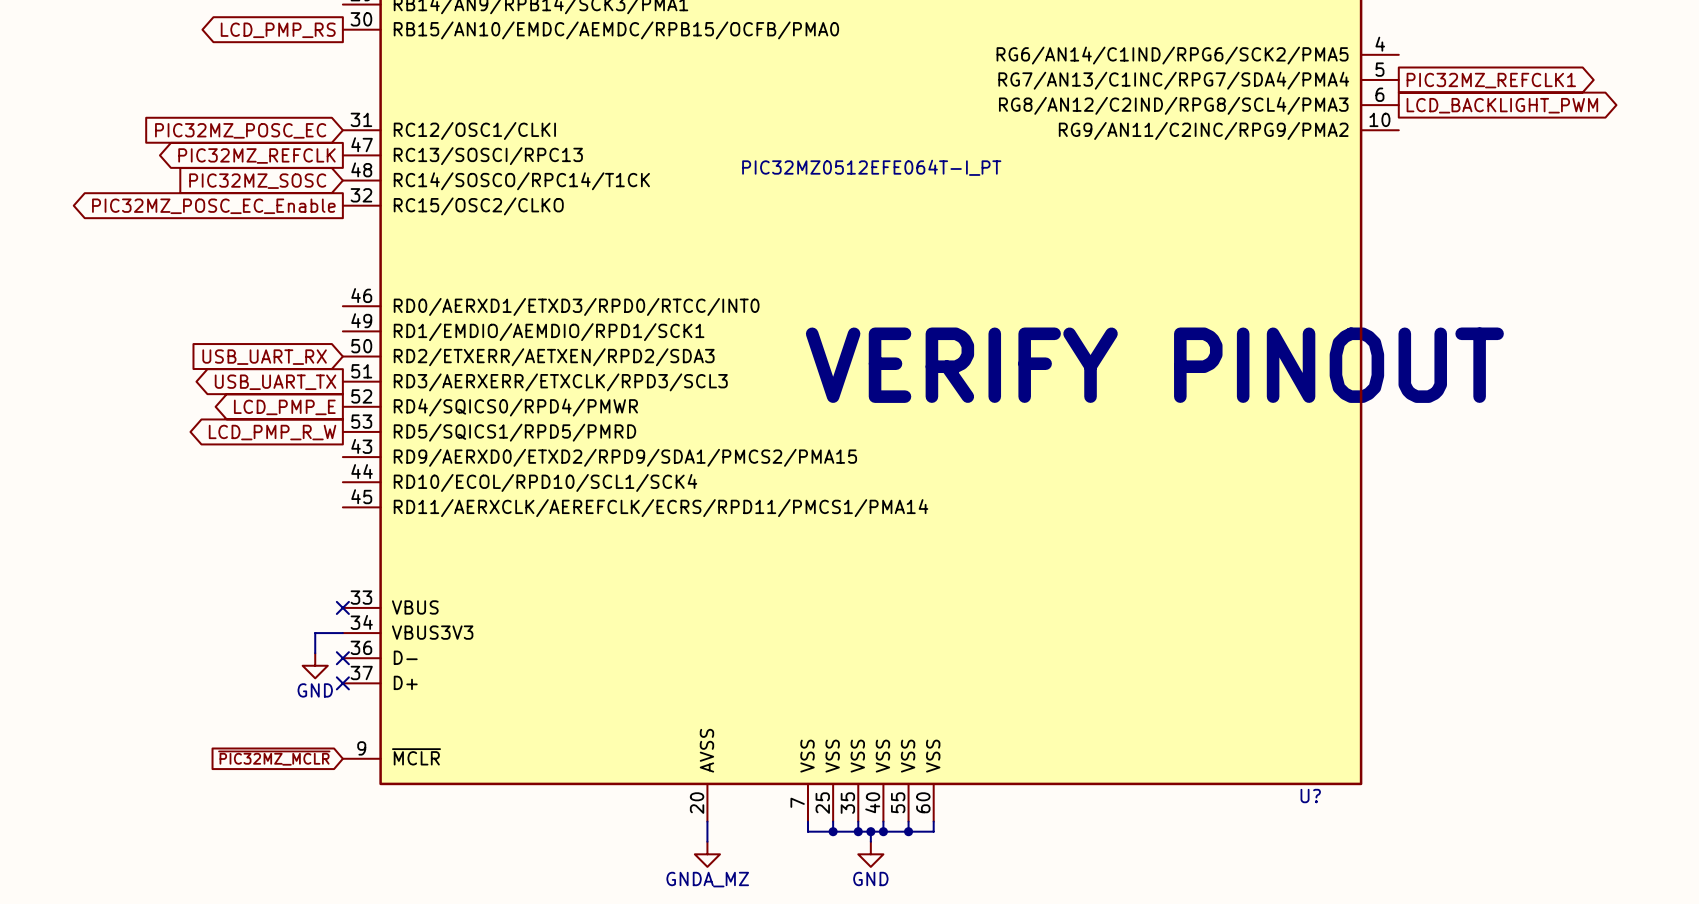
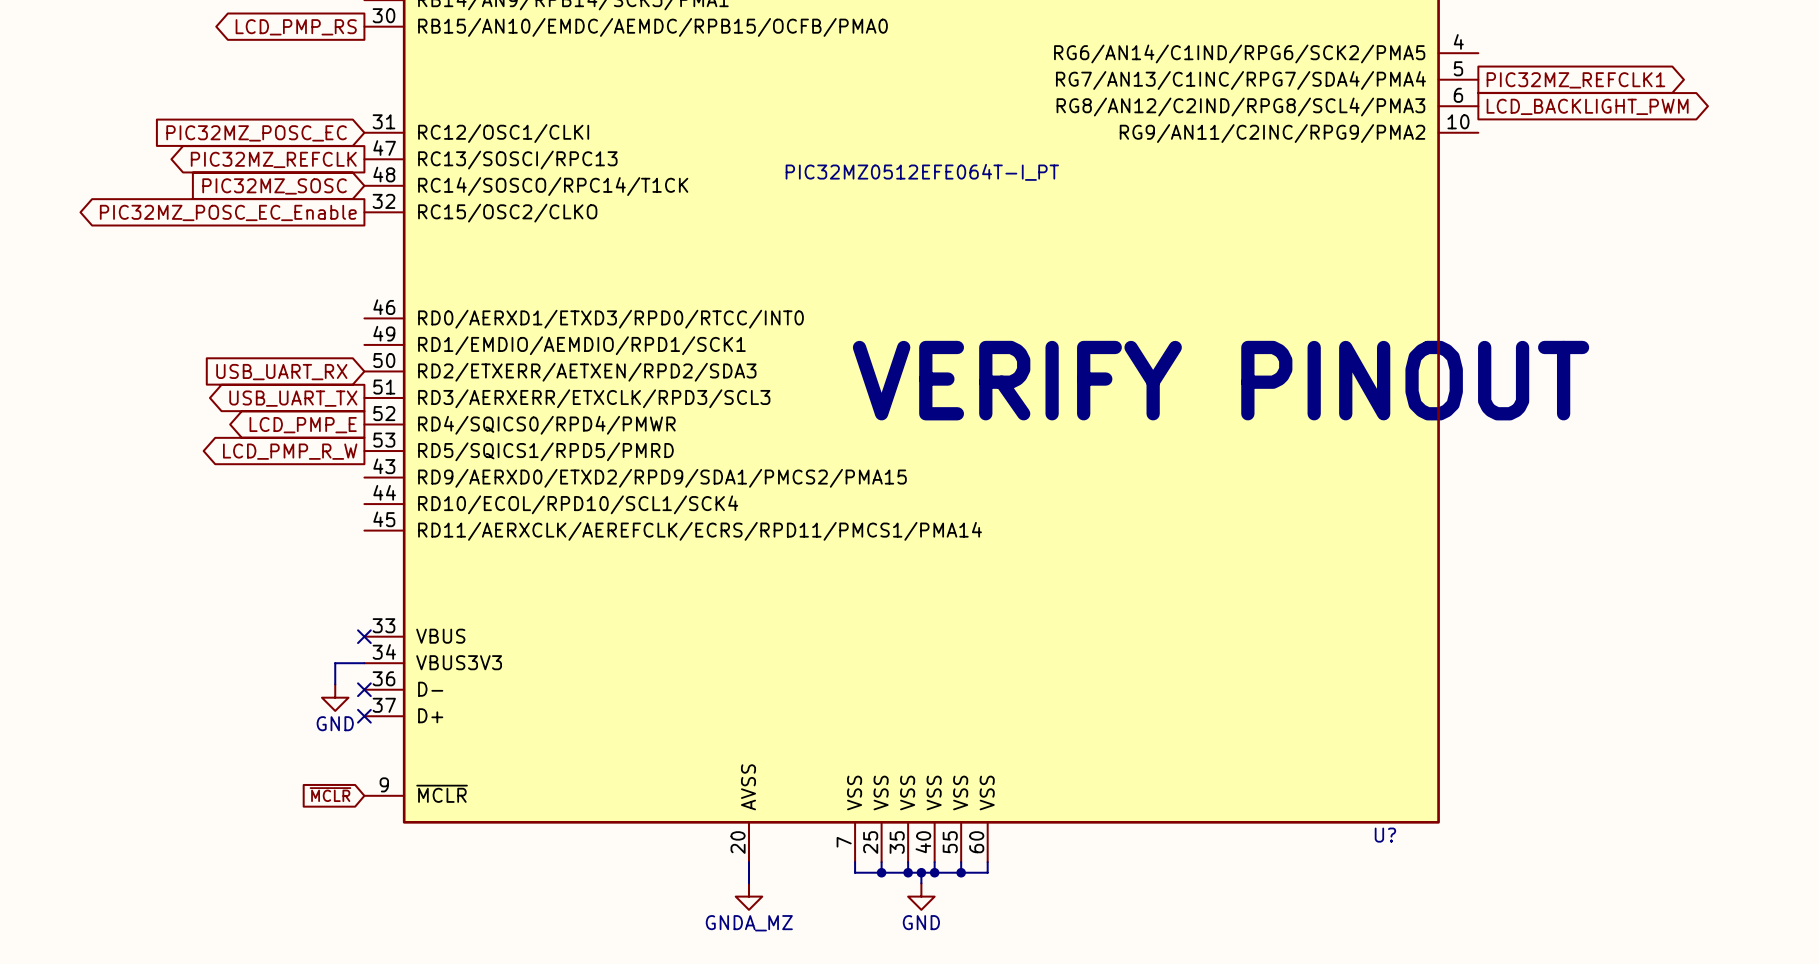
global label: ~{PIC32MZ_MCLR} (274, 758) -> ~{MCLR} (330, 794)

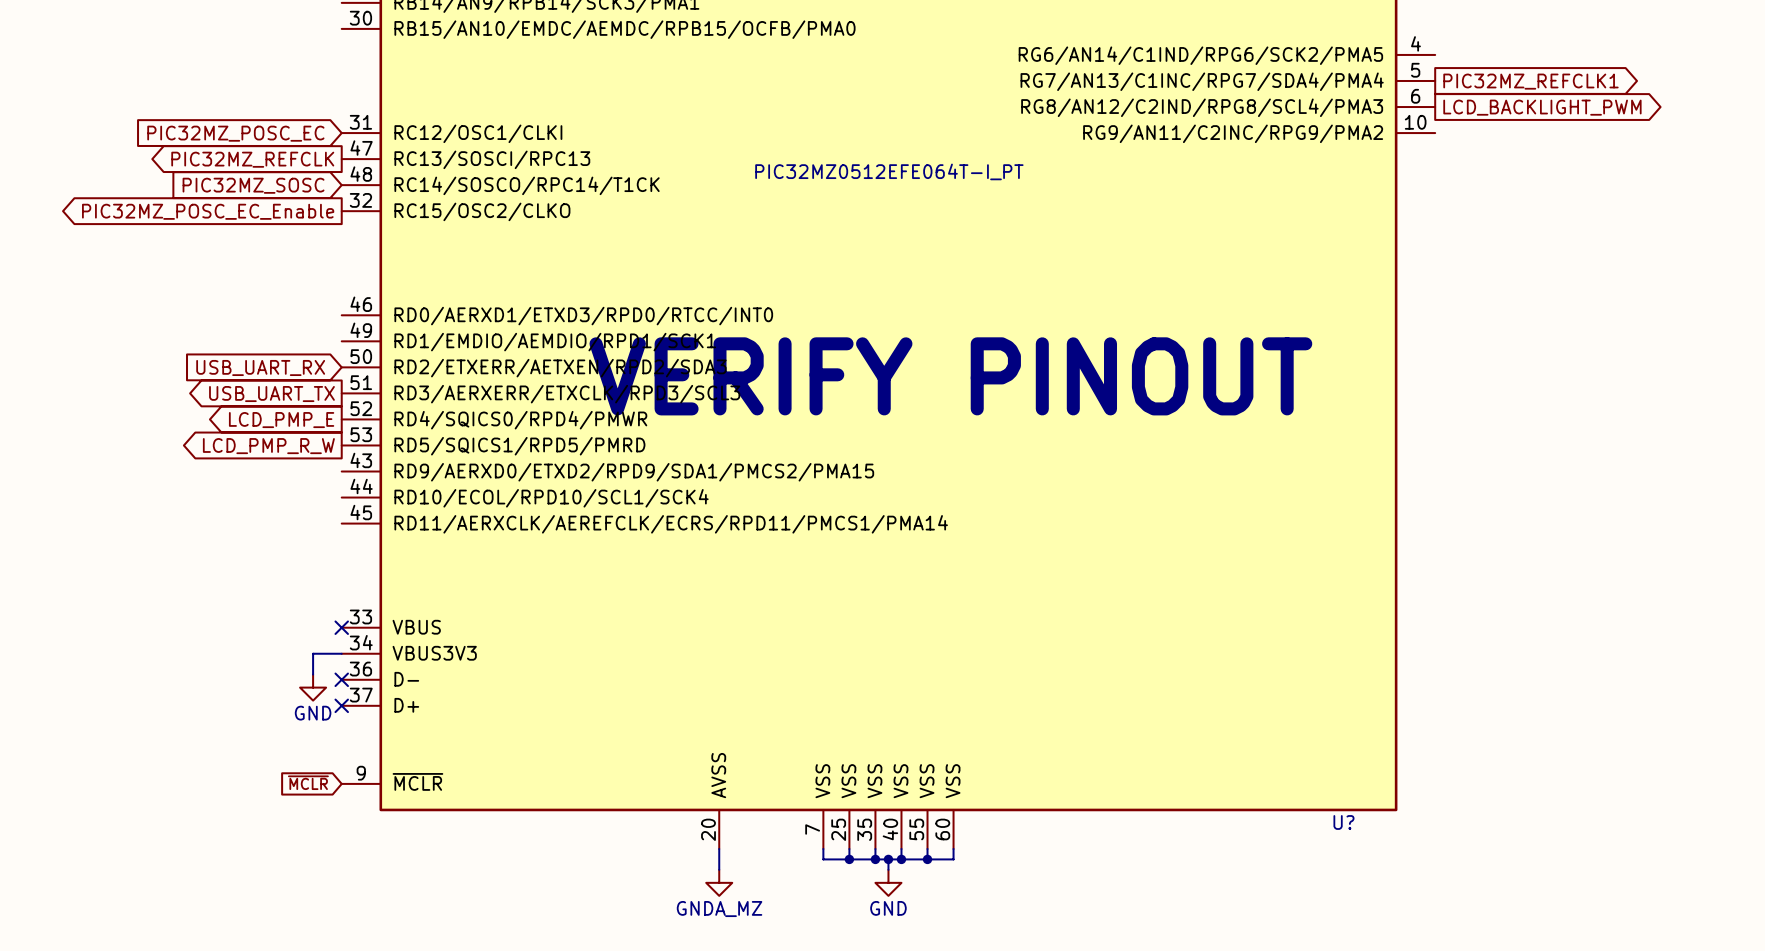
global label: LCD_PMP_RS (296, 27) -> none
text position: VERIFY PINOUT (1221, 380) -> VERIFY PINOUT (950, 376)

